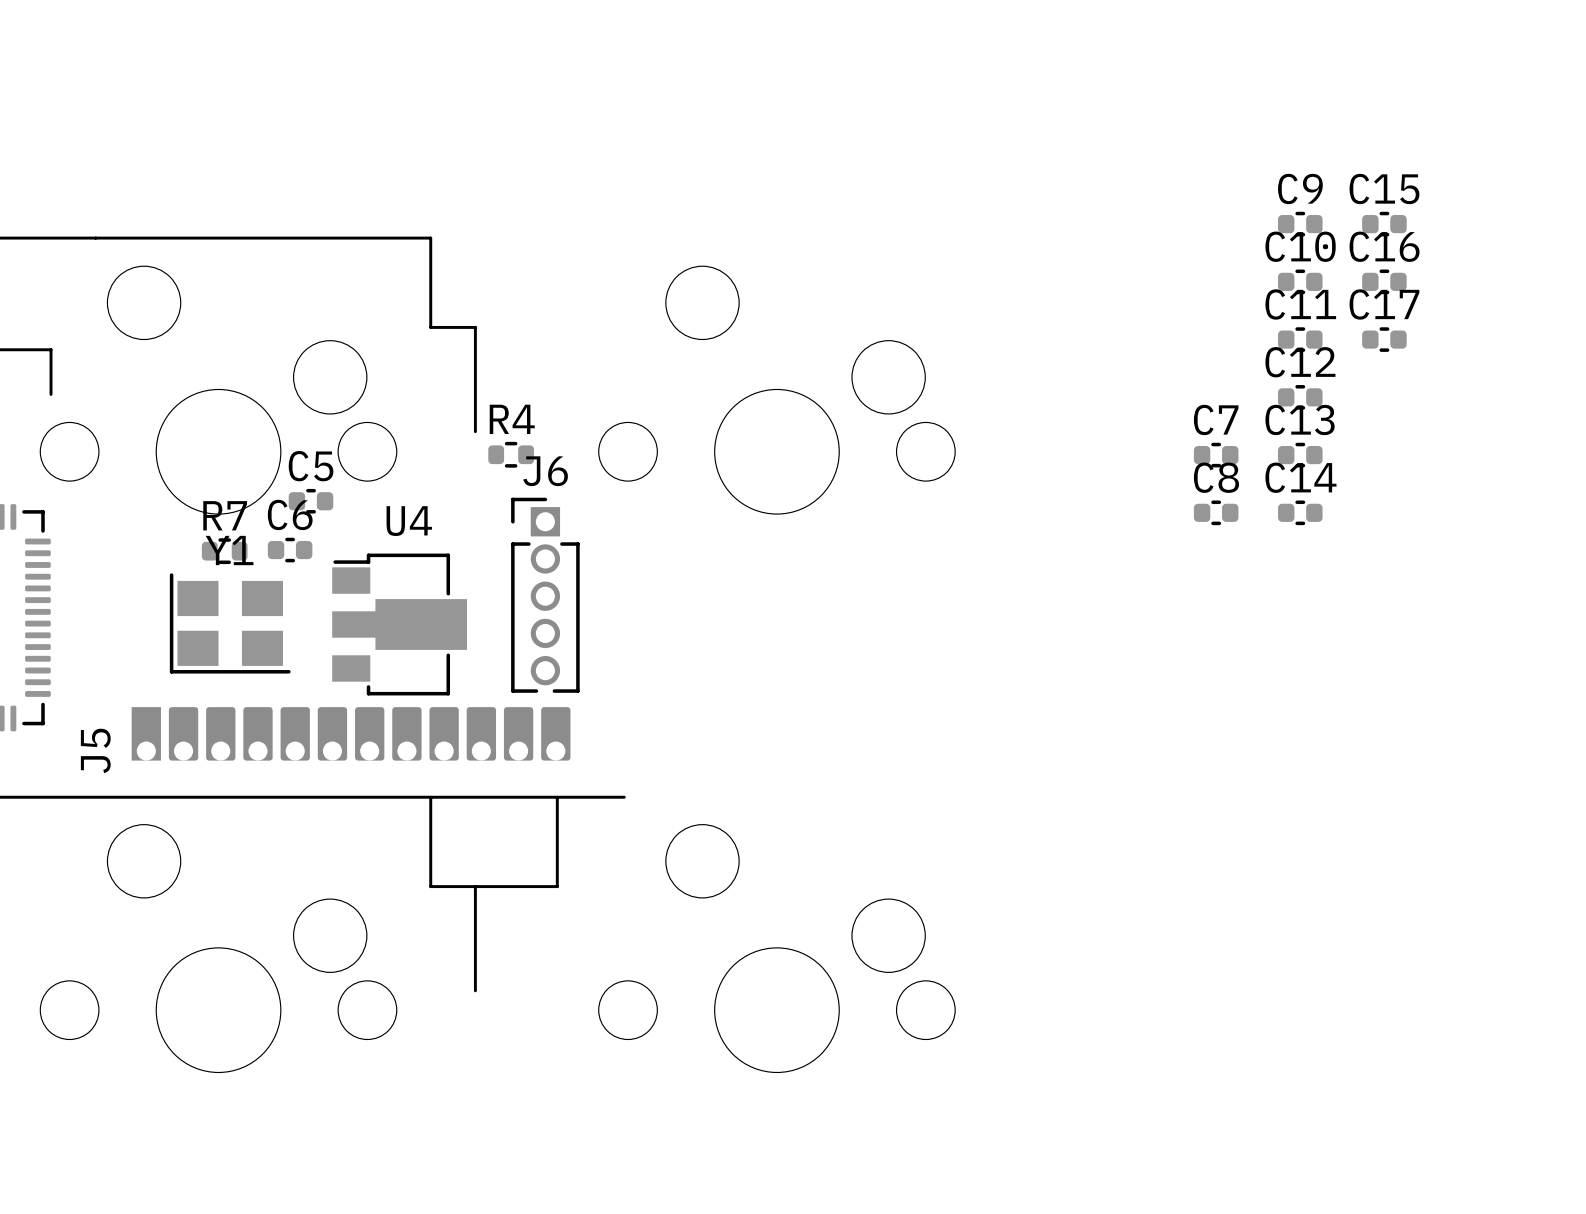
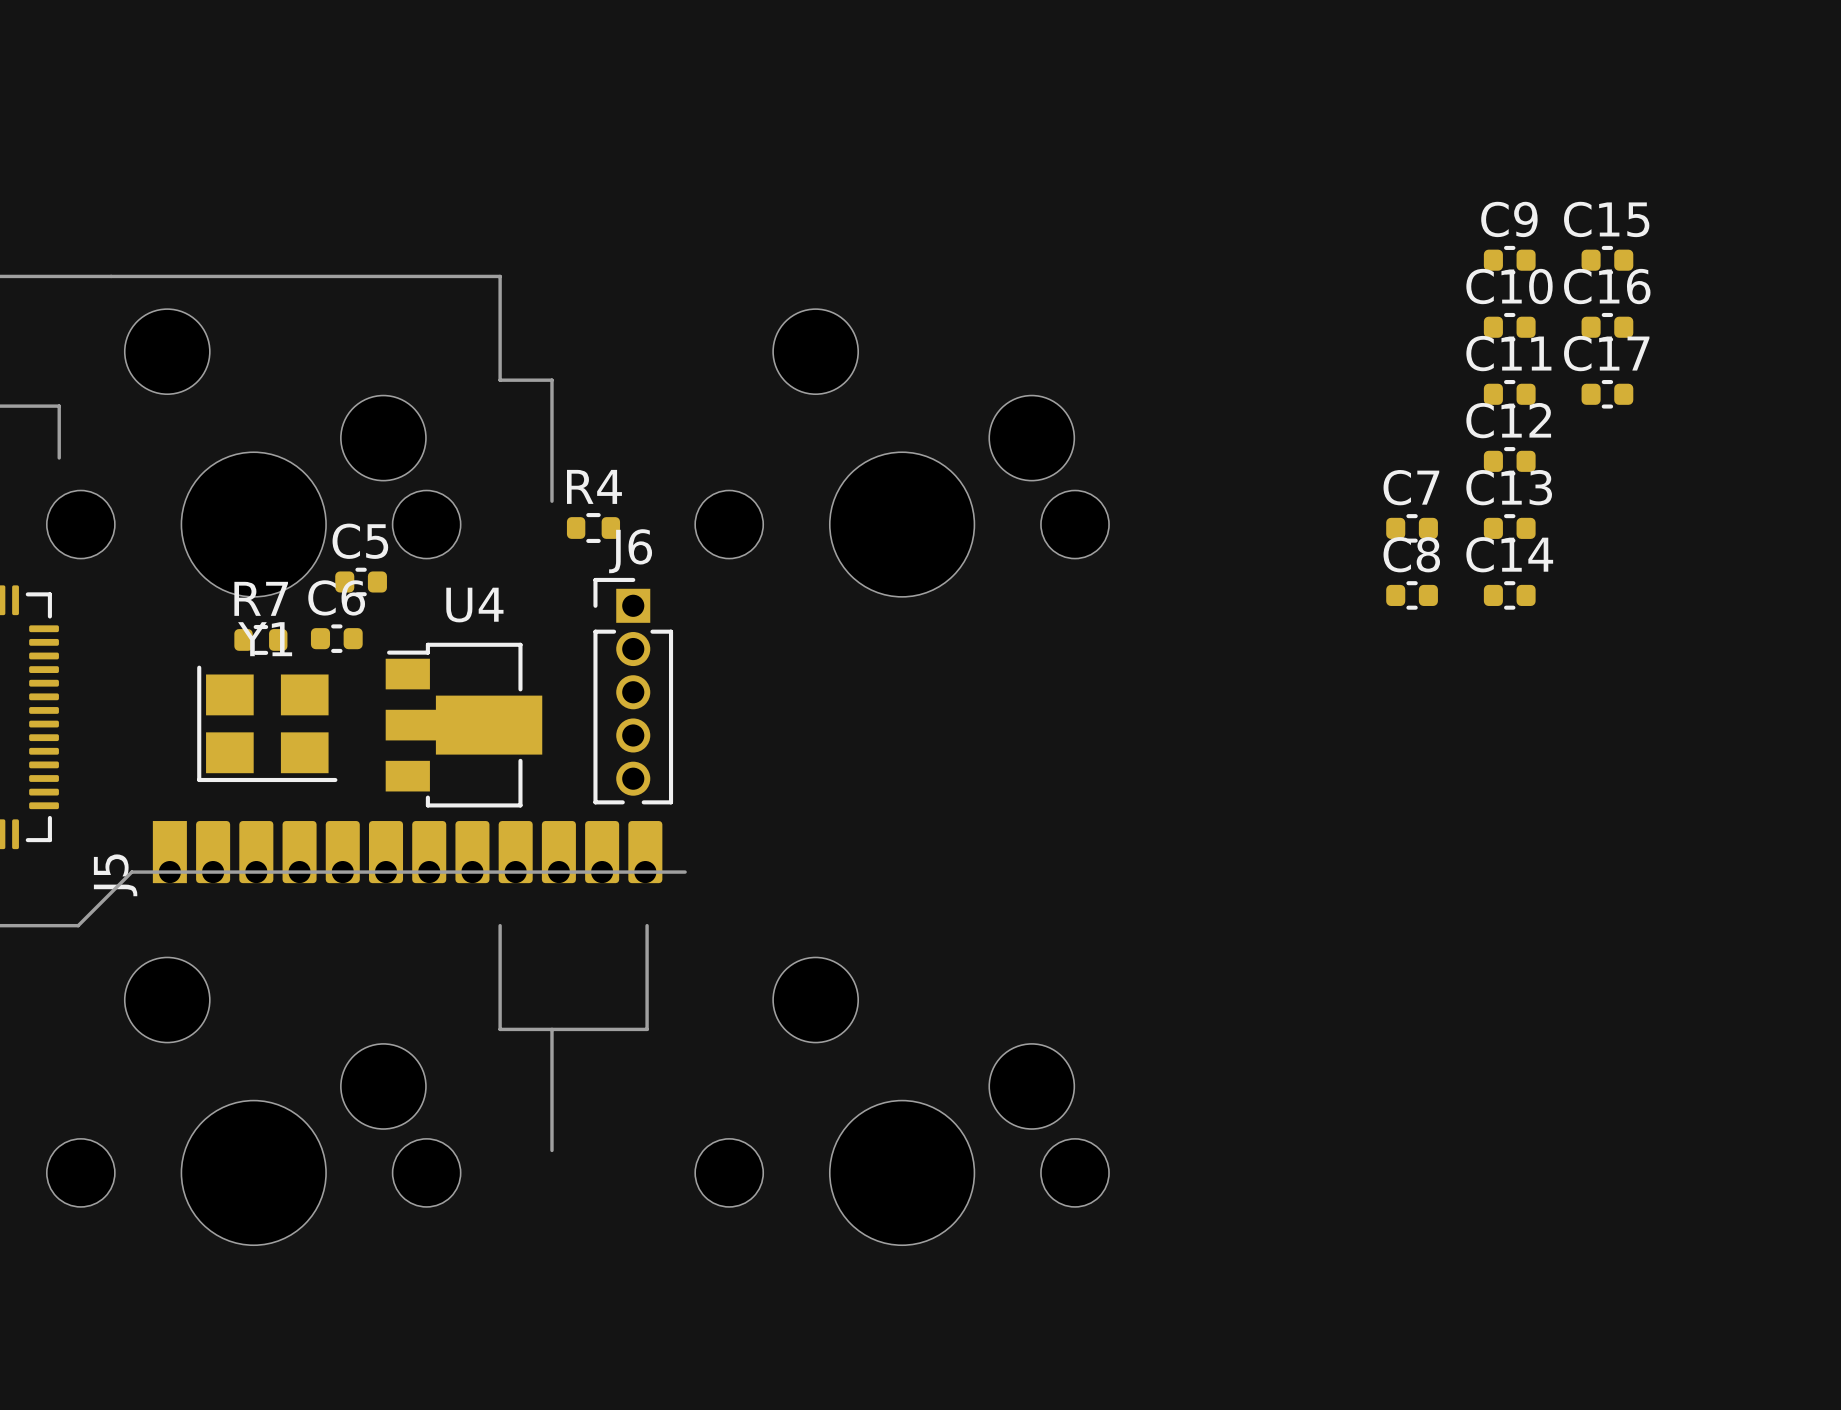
board edge: (67, 797) (624, 797) -> (78, 925) (131, 872) (685, 872)

